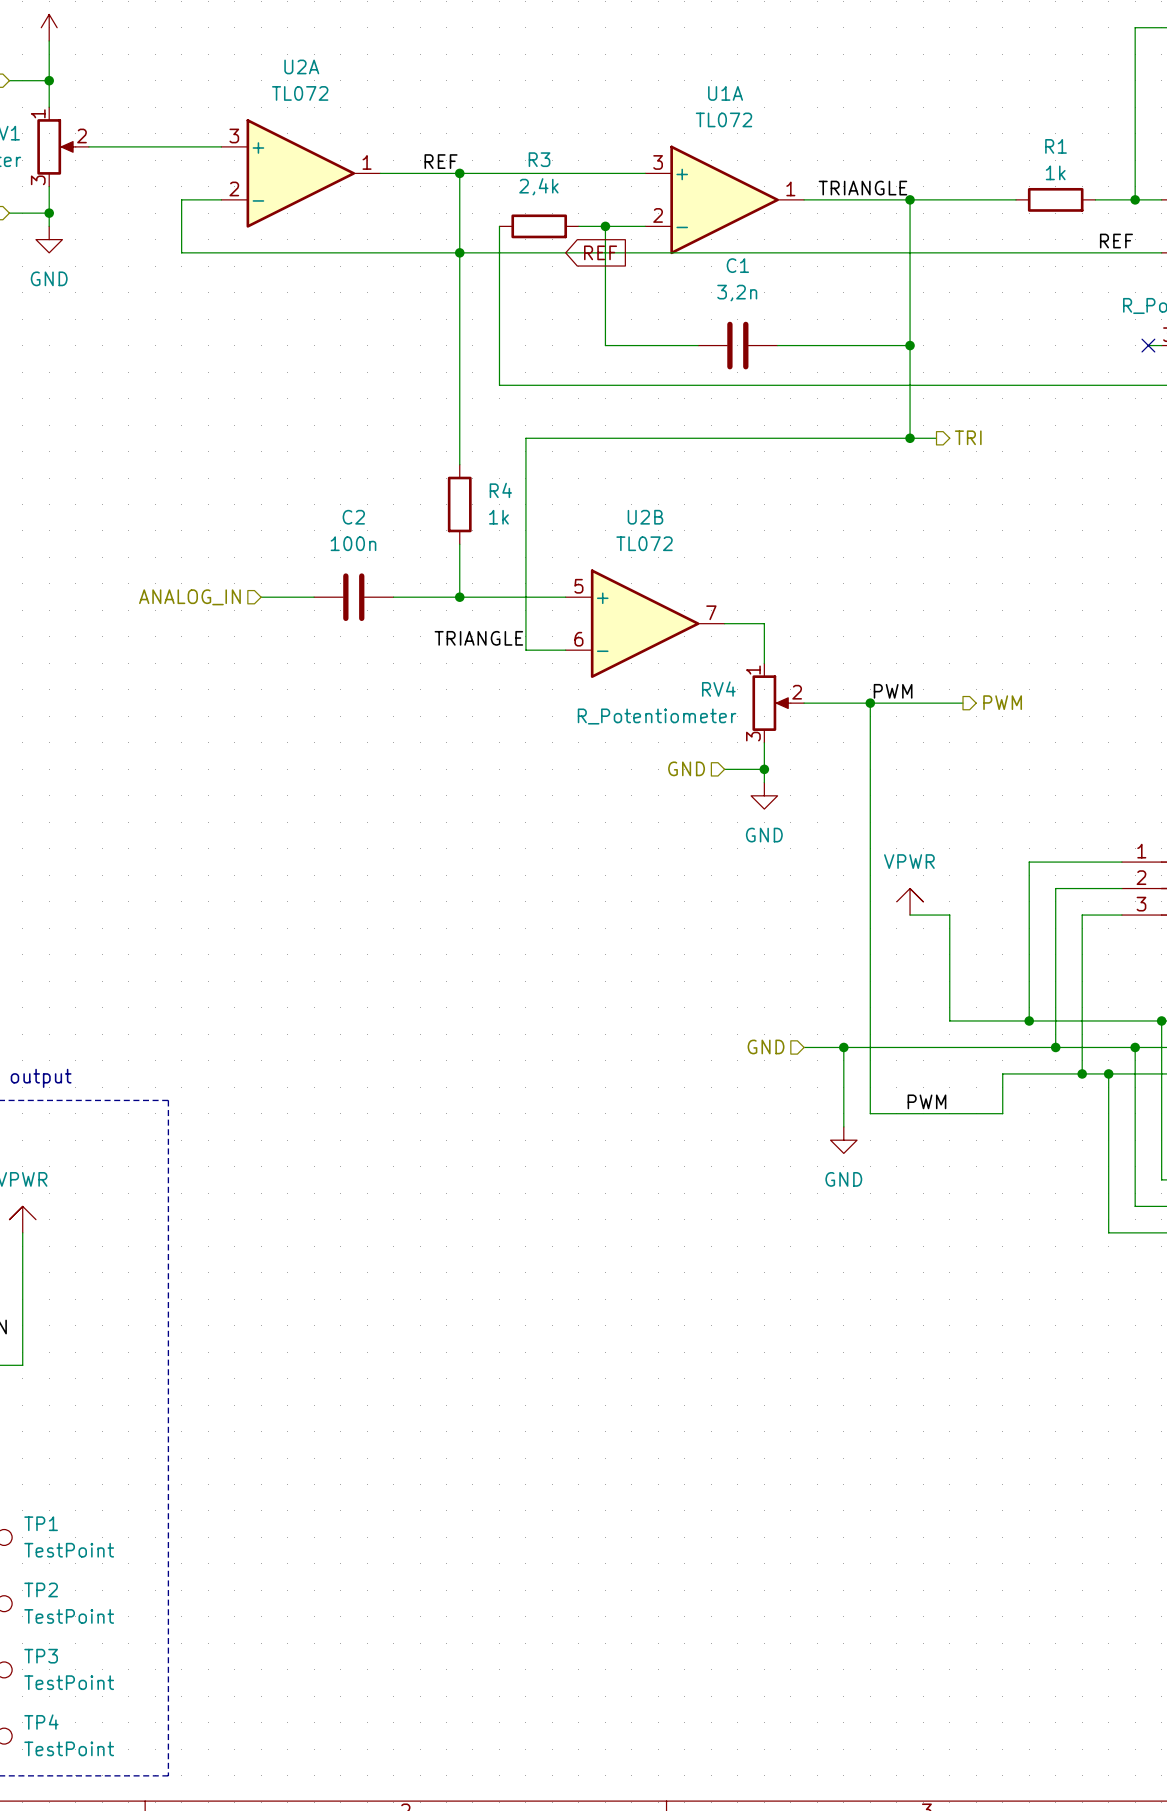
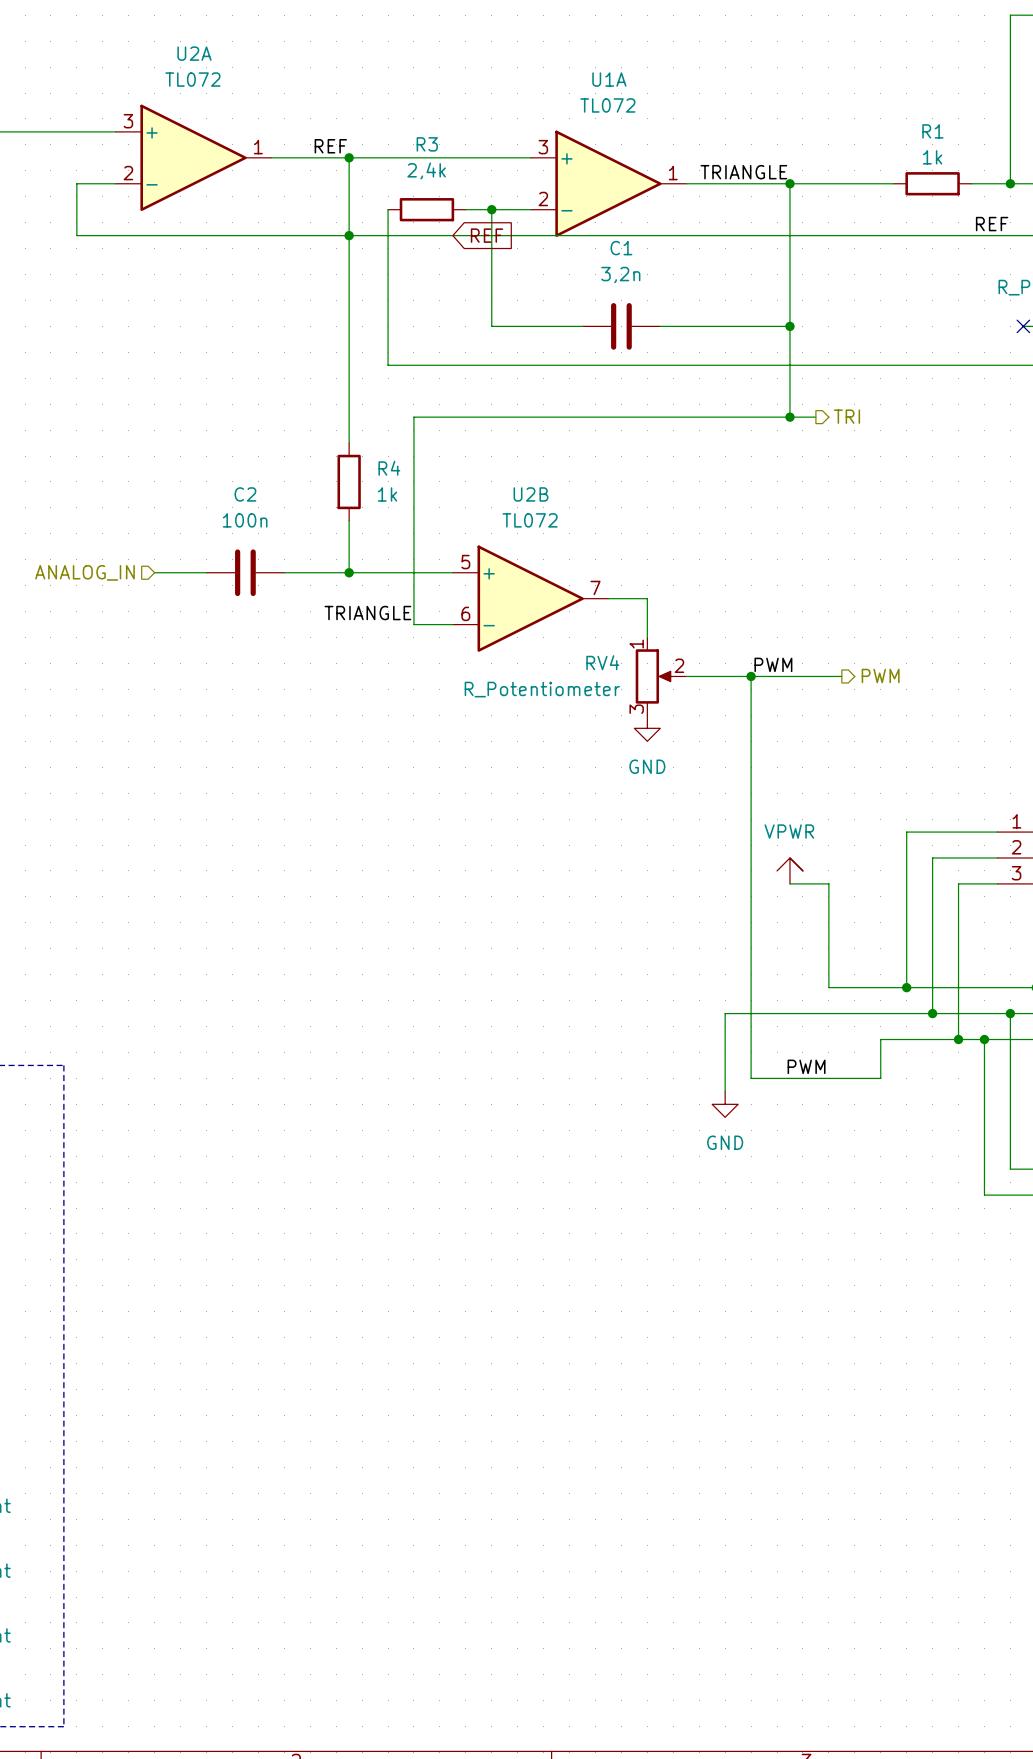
wire: (764, 742) (764, 782) -> none
hierarchical label: GND (686, 768) -> none
wire: (724, 769) (764, 769) -> none
junction: (764, 769) -> none
power symbol position: GND (764, 795) -> GND (647, 728)
hierarchical label: GND (766, 1046) -> none
wire: (804, 1047) (843, 1047) -> none
junction: (843, 1047) -> none

